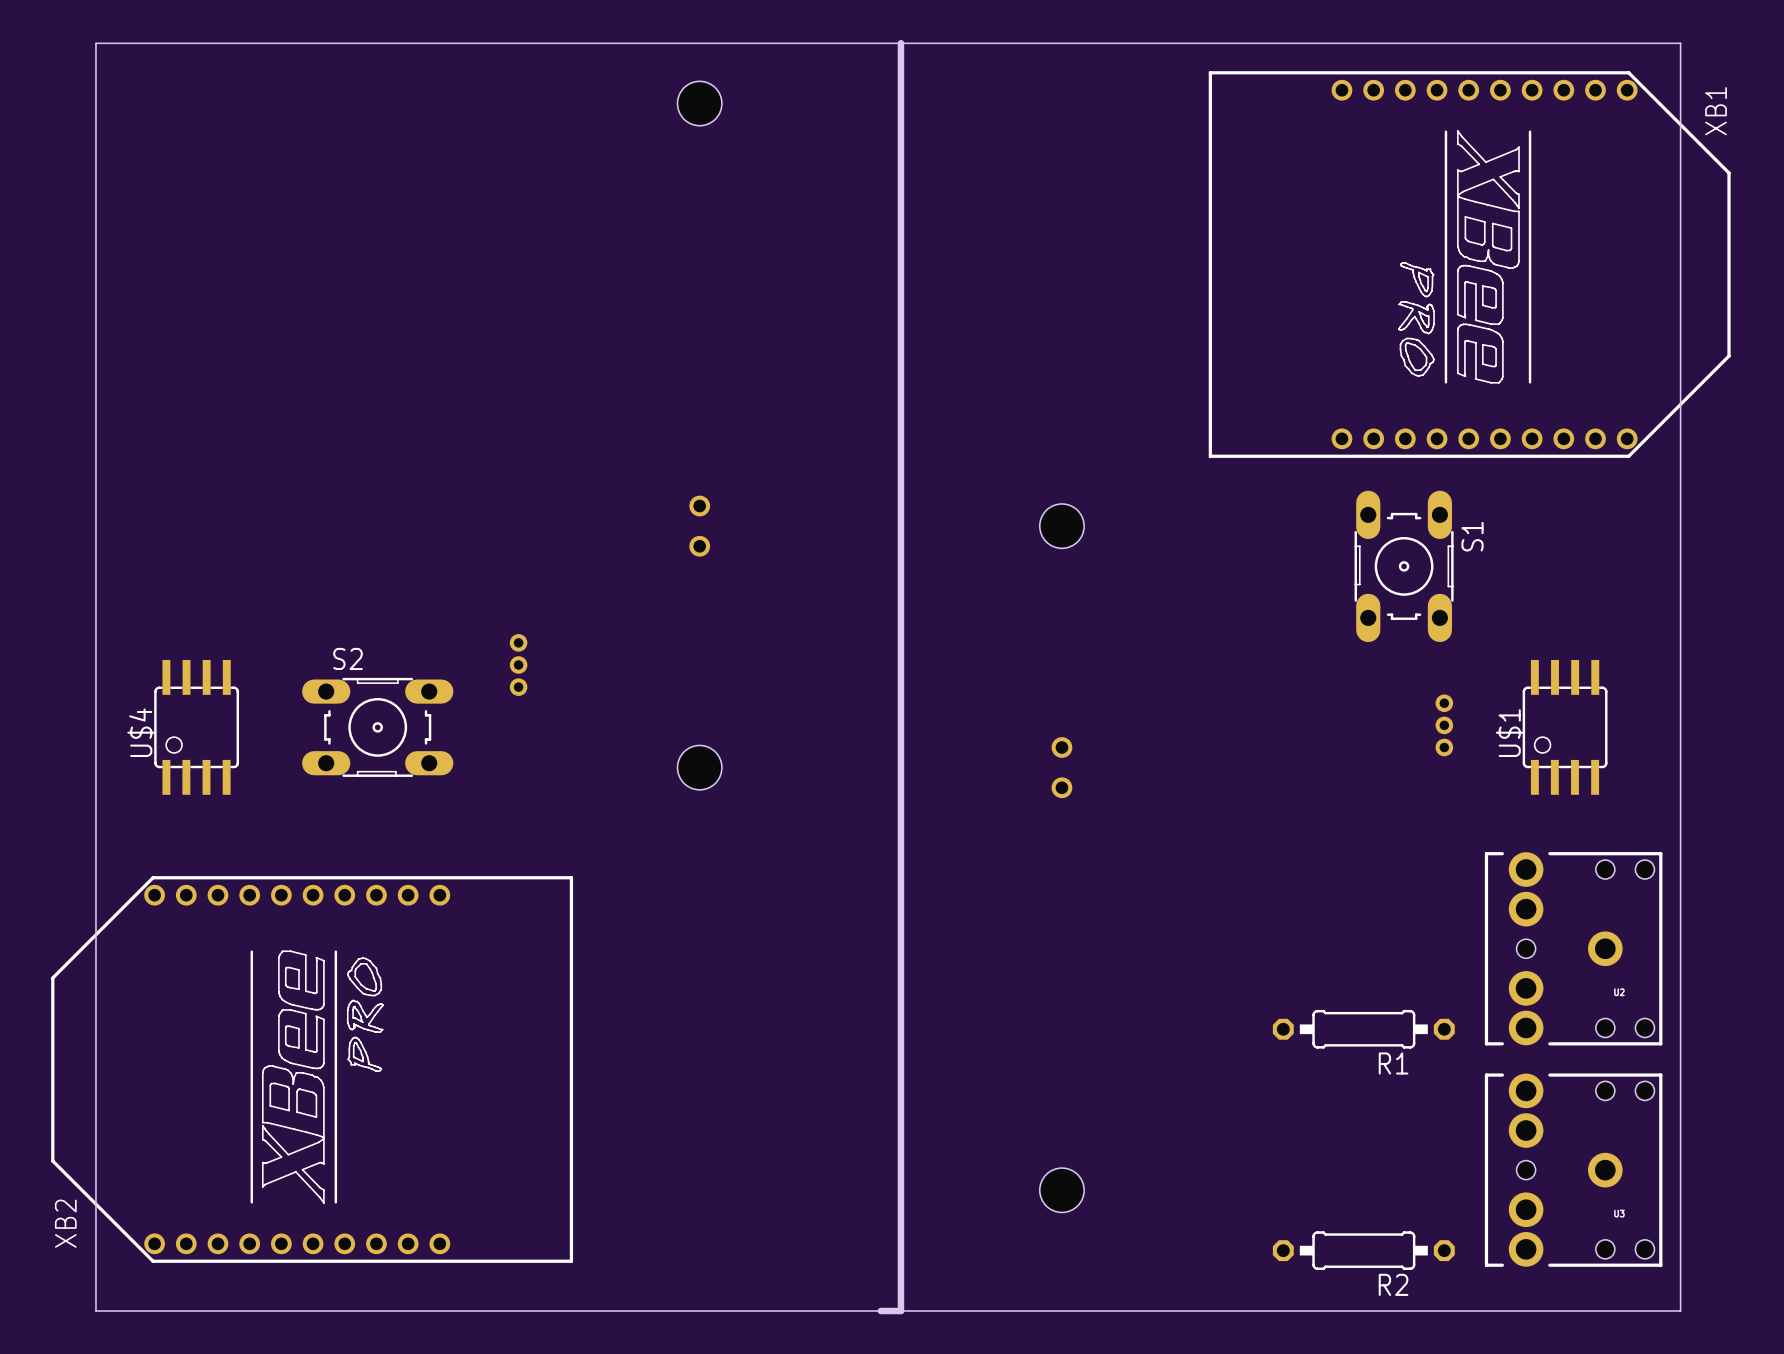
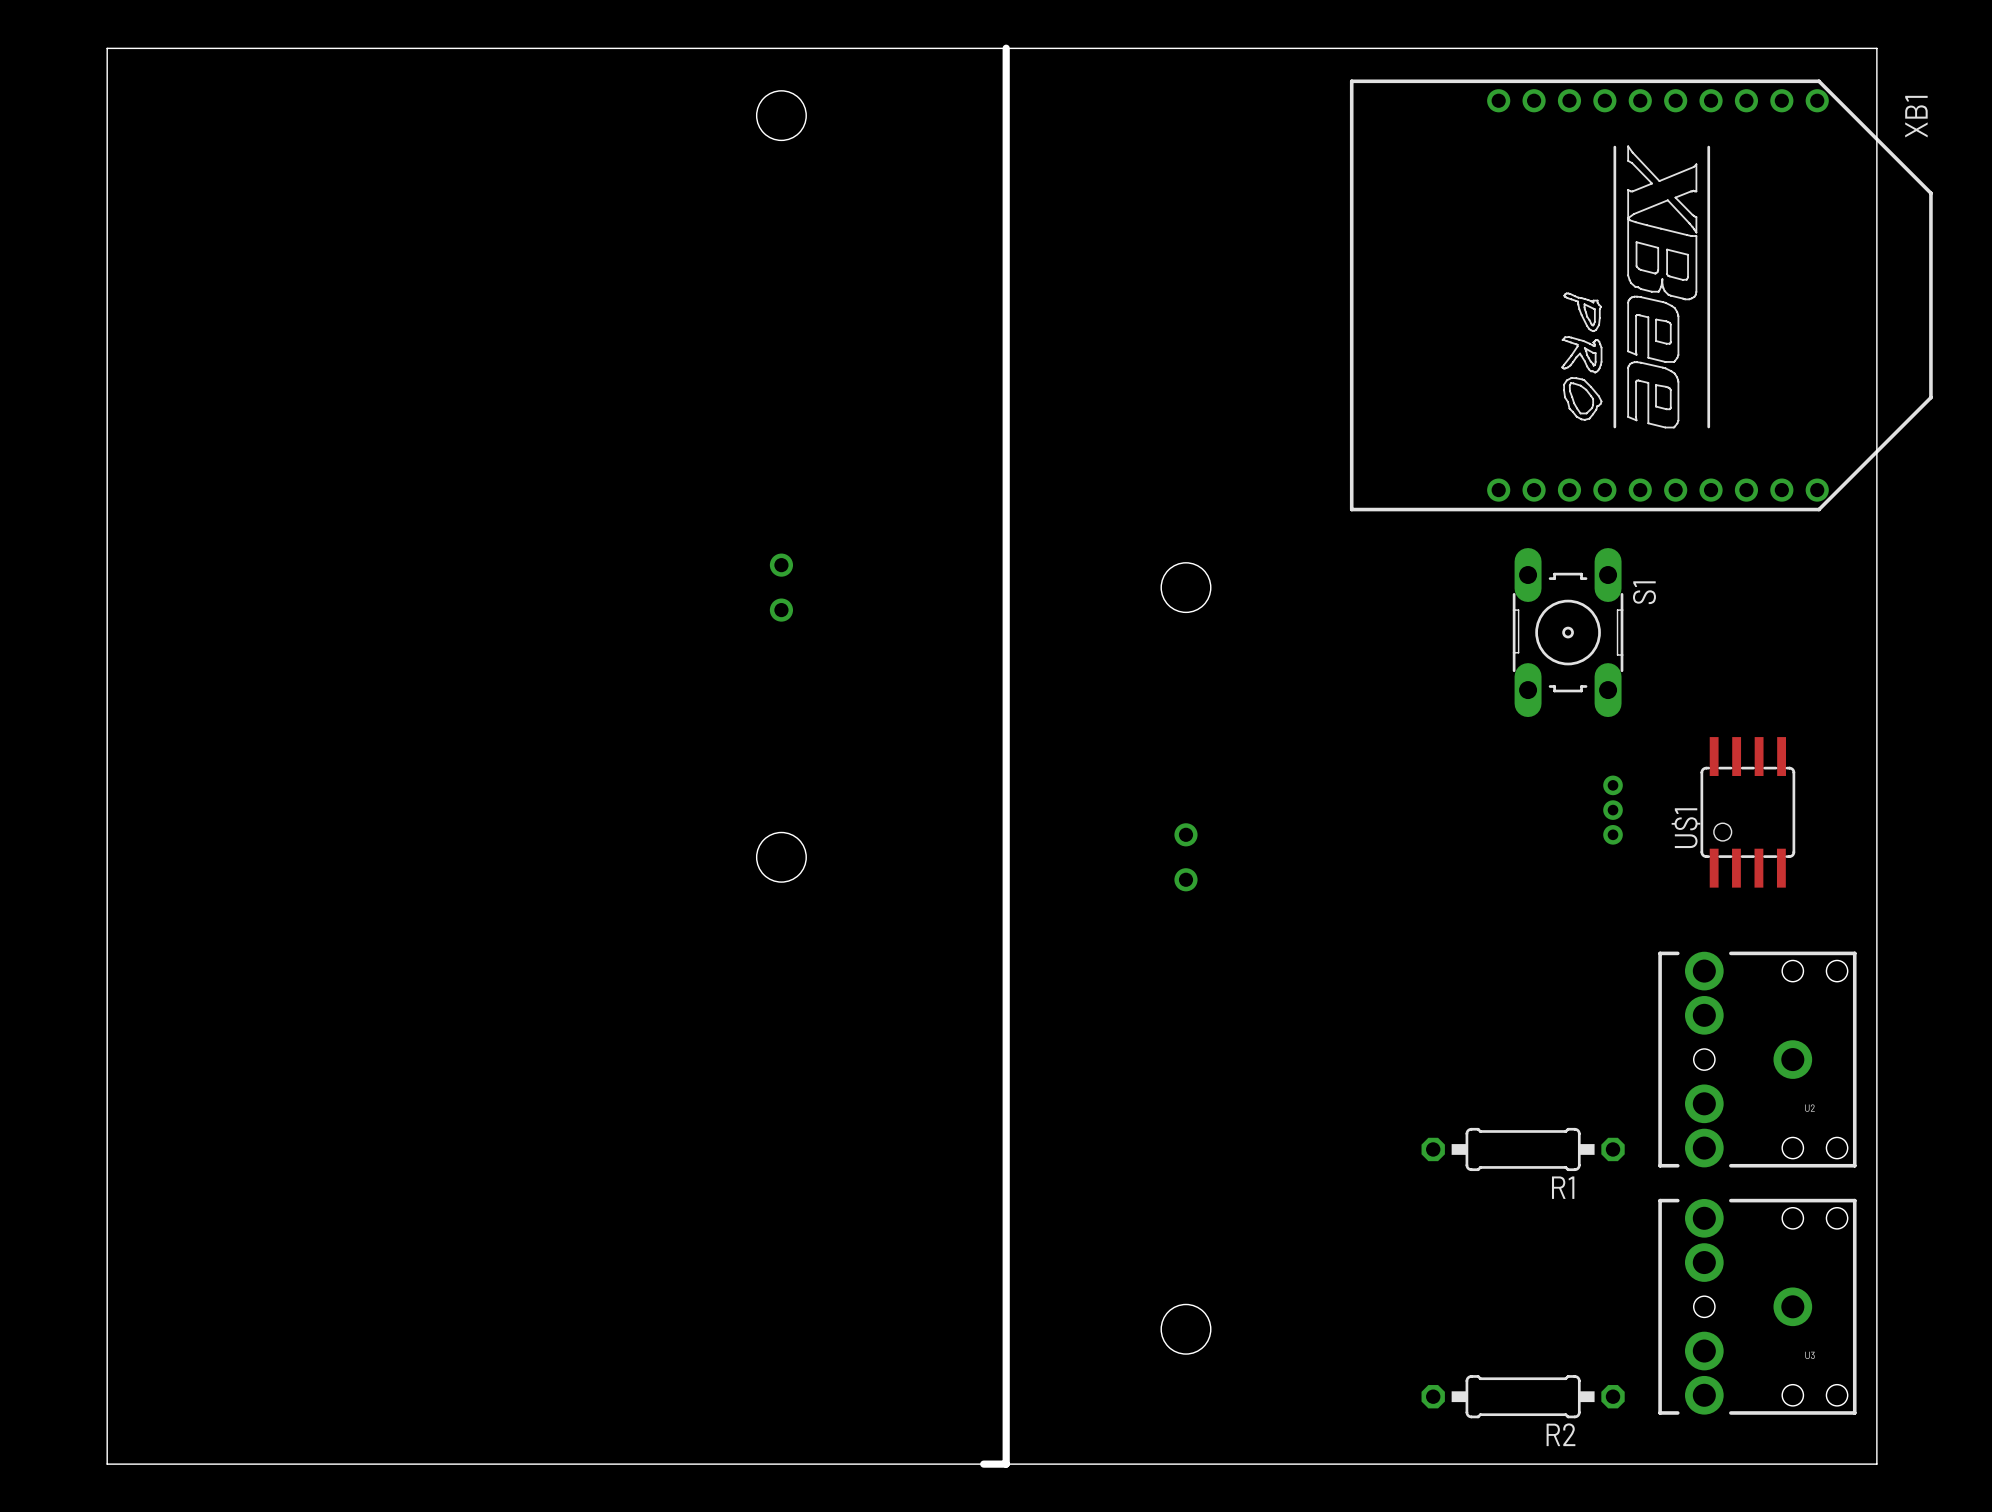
part: (518, 665) -> none
U$4: (196, 727) -> none
S2: (377, 727) -> none
XB2: (312, 1069) -> none

